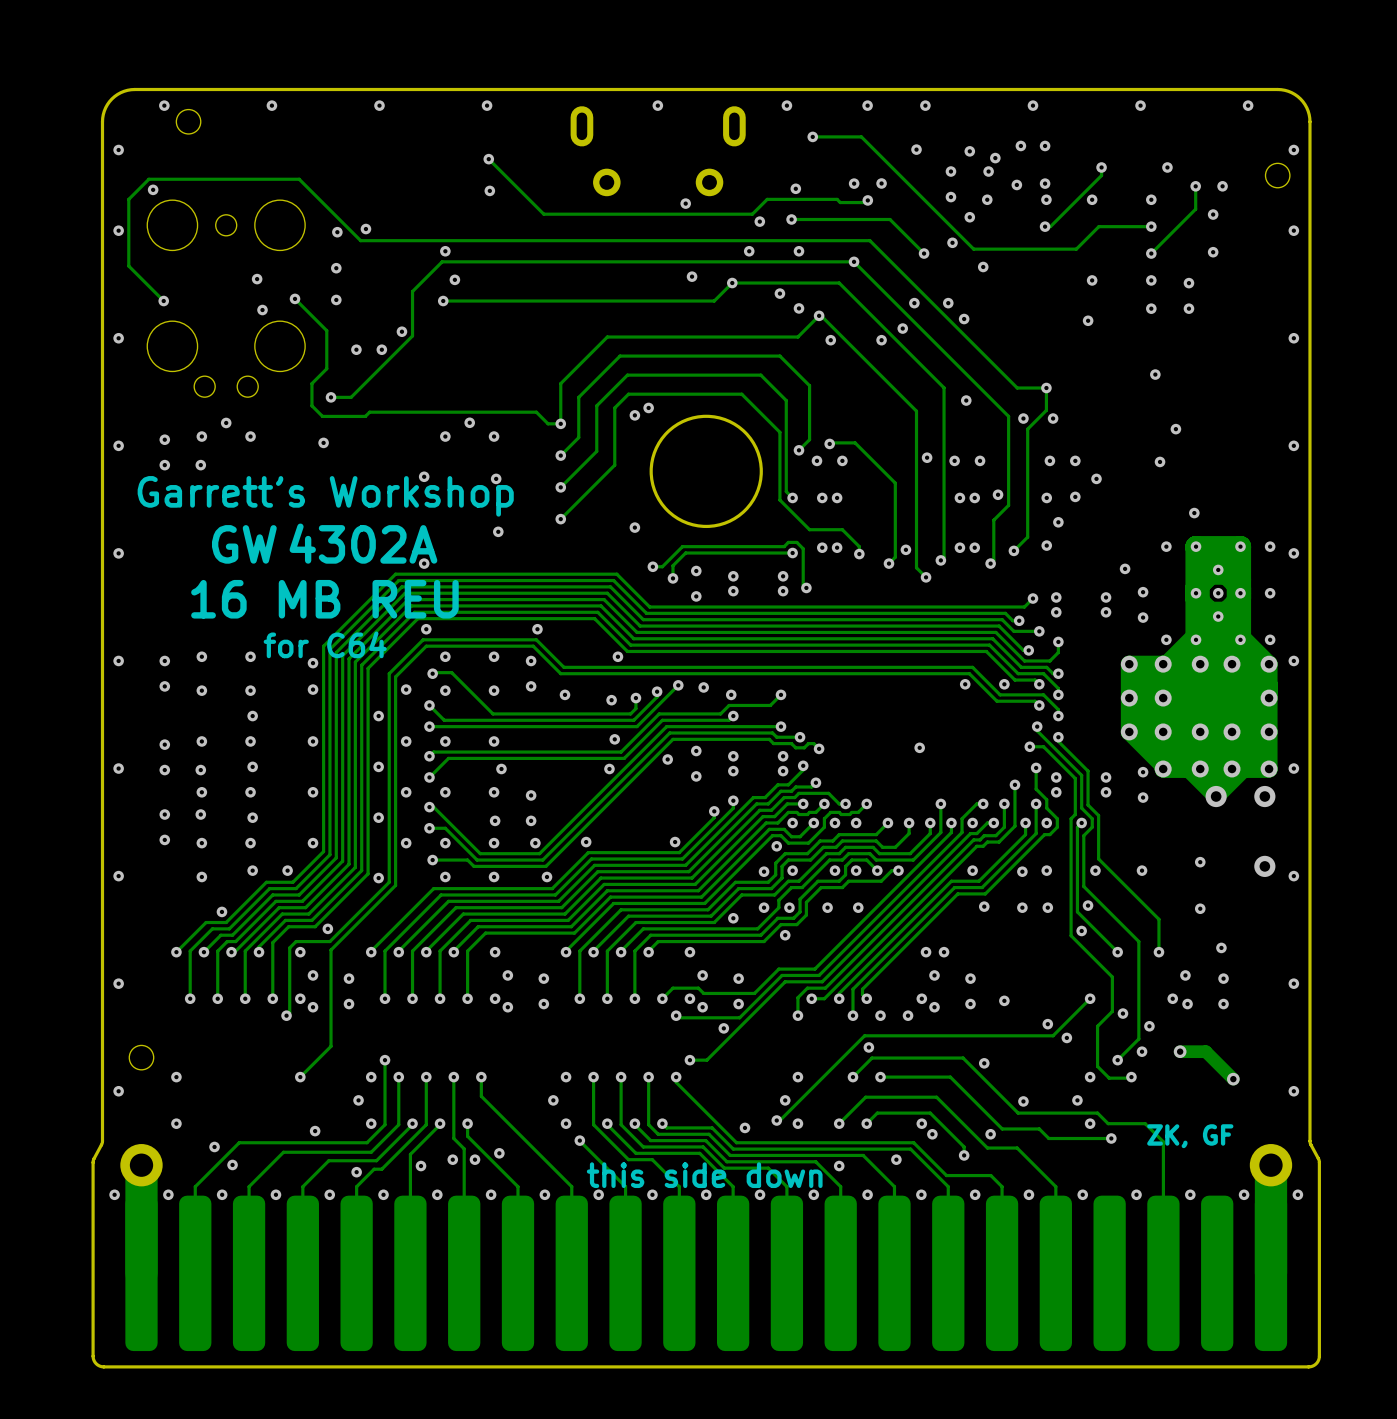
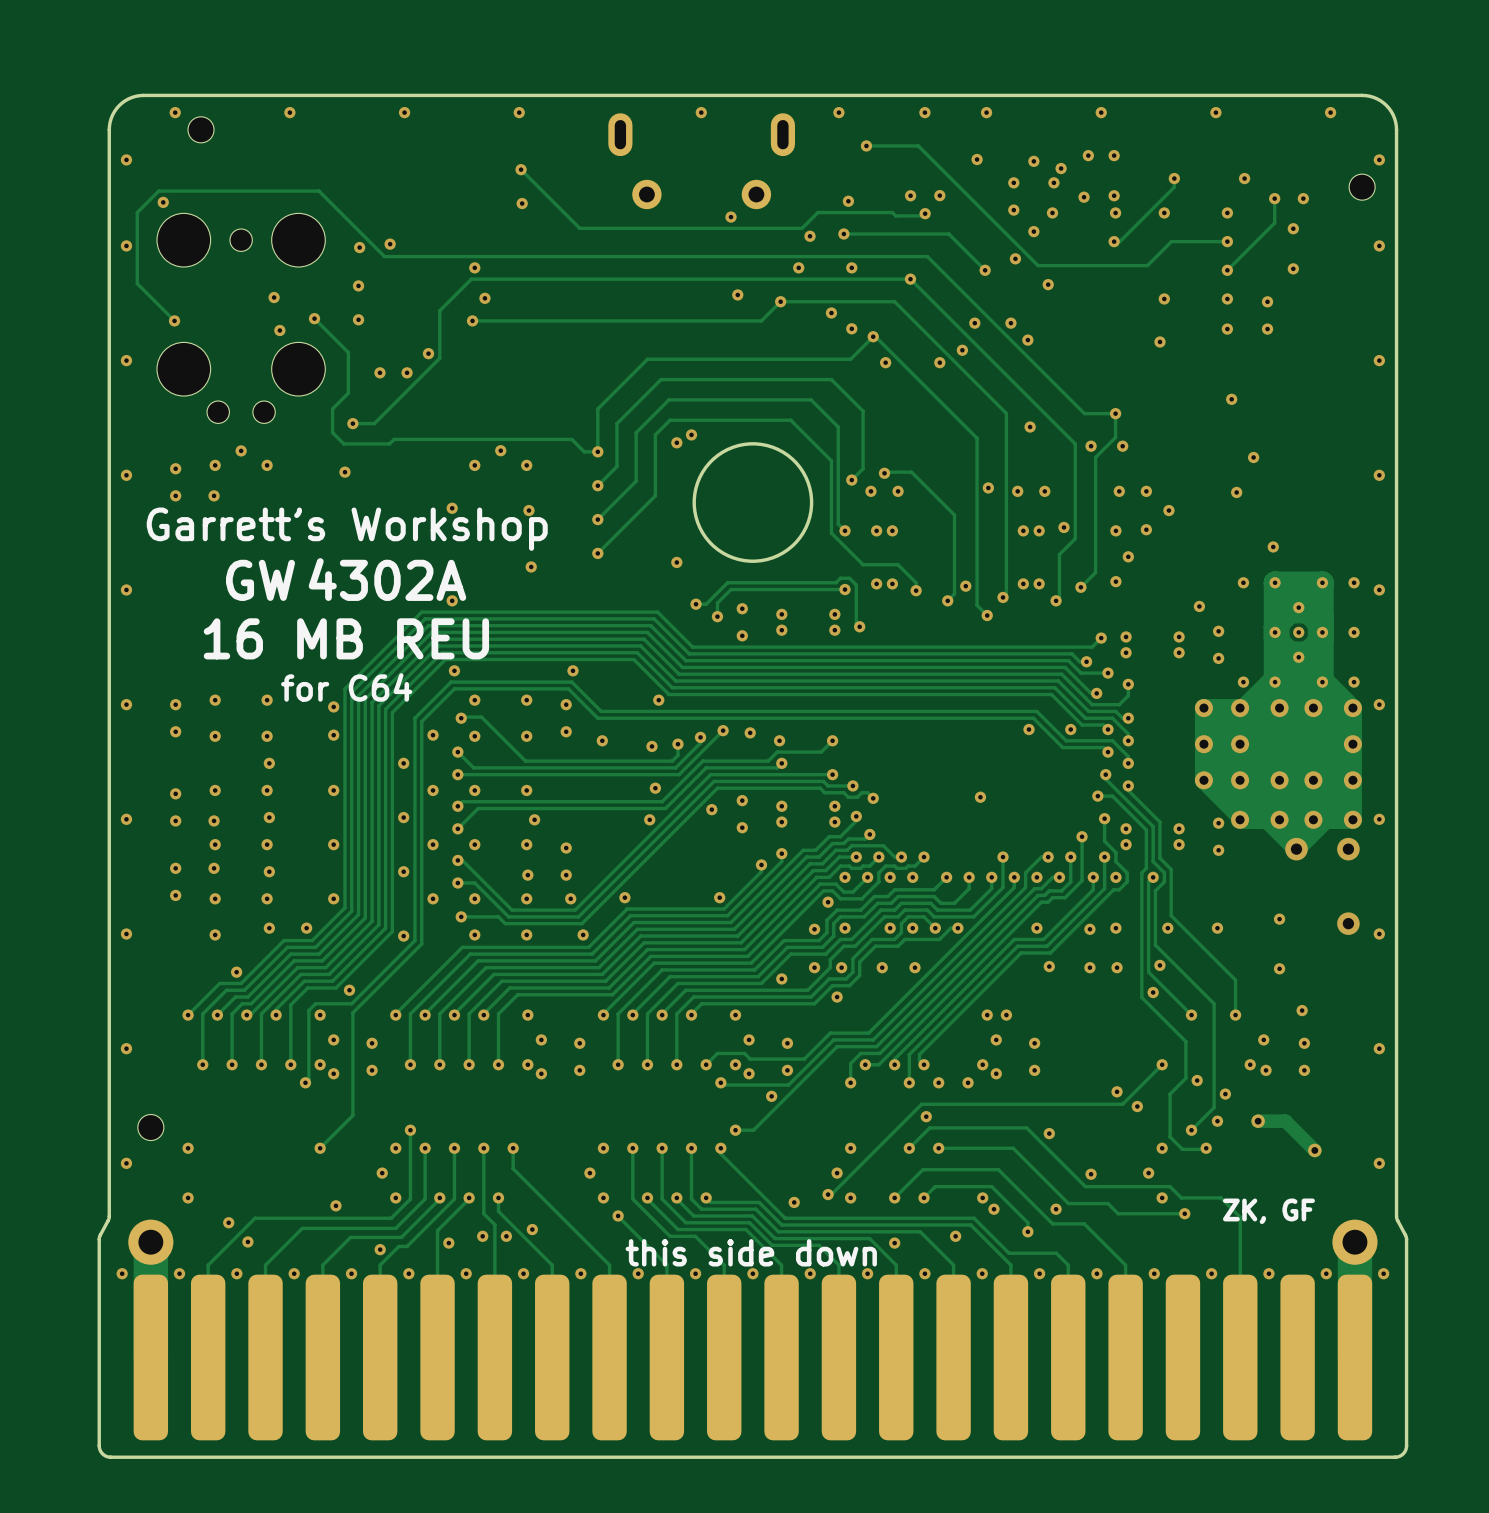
via: (1004, 1000) -> none

